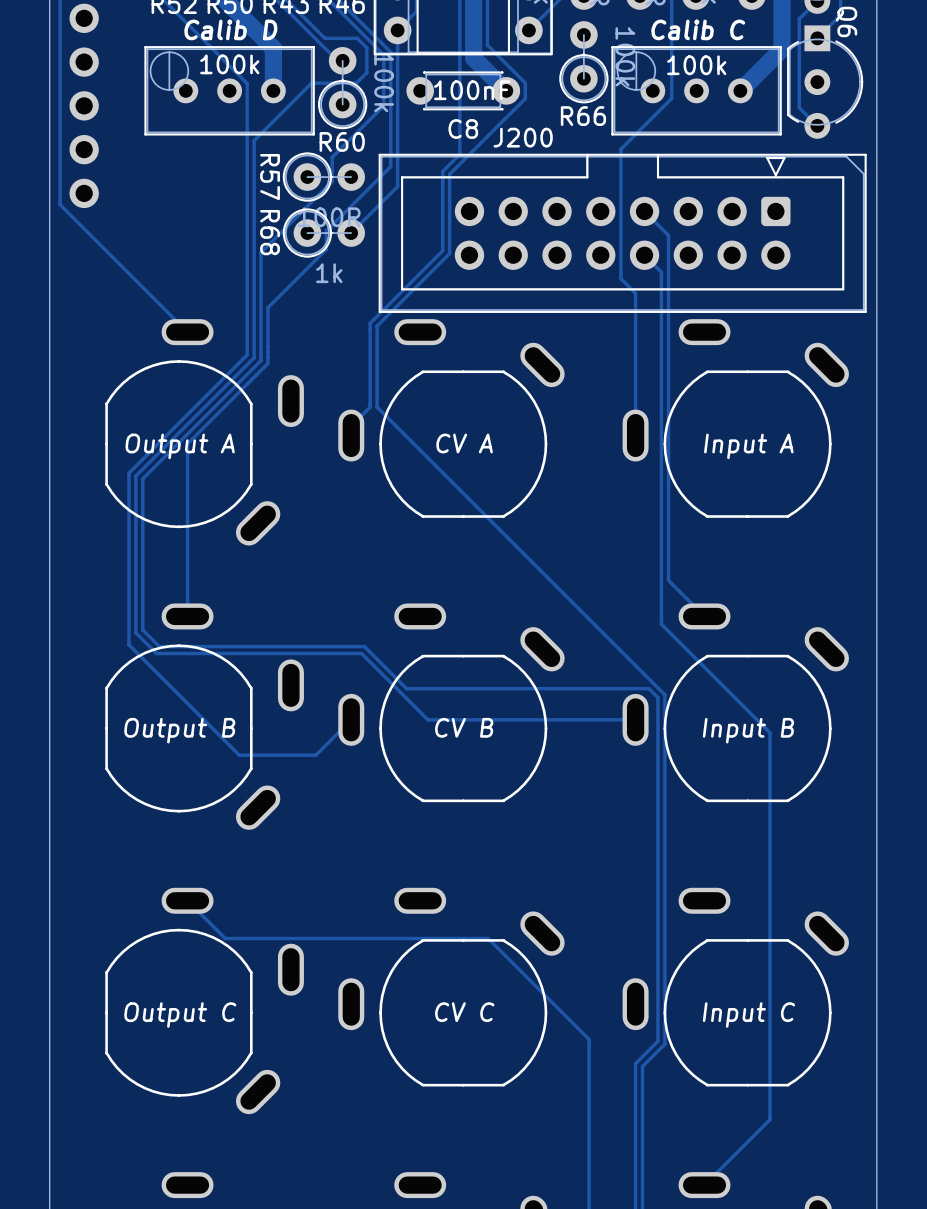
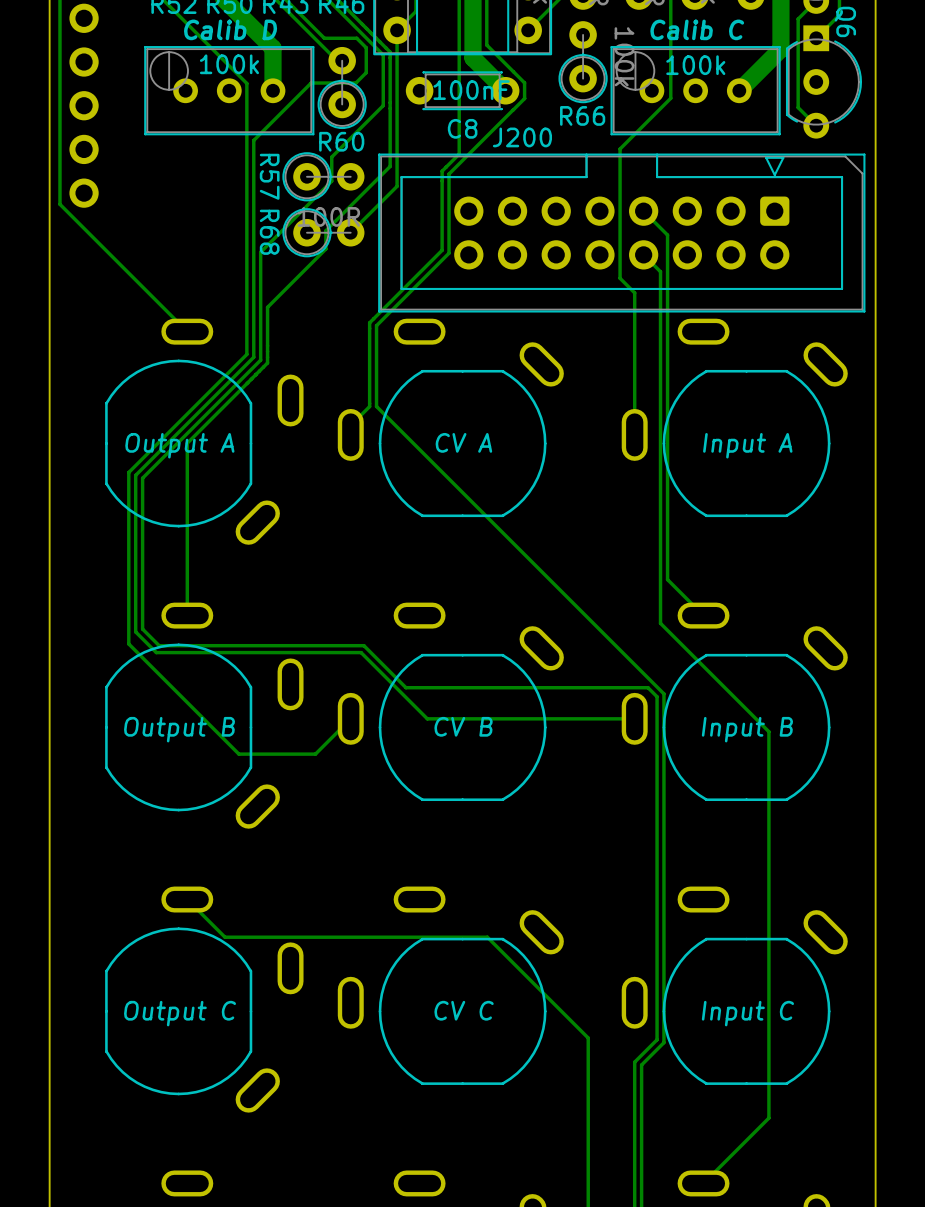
R60 value: 100k (384, 82) -> none
R68 value: 1k (329, 273) -> none

